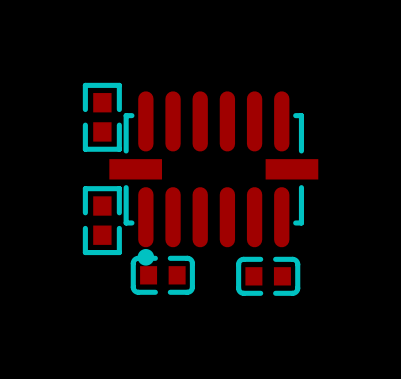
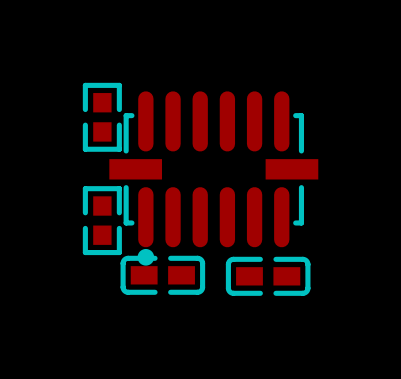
part footprint: [130, 255, 195, 295] -> [120, 255, 206, 295]
part footprint: [236, 256, 301, 296] -> [225, 256, 311, 296]

